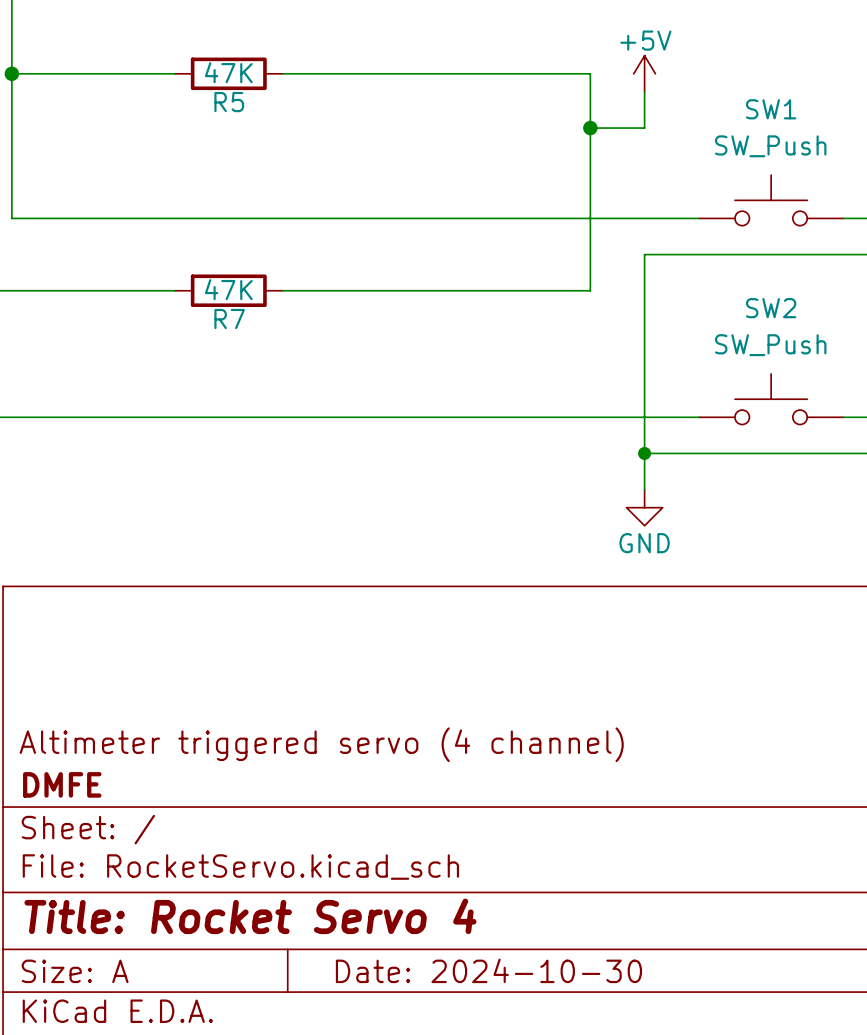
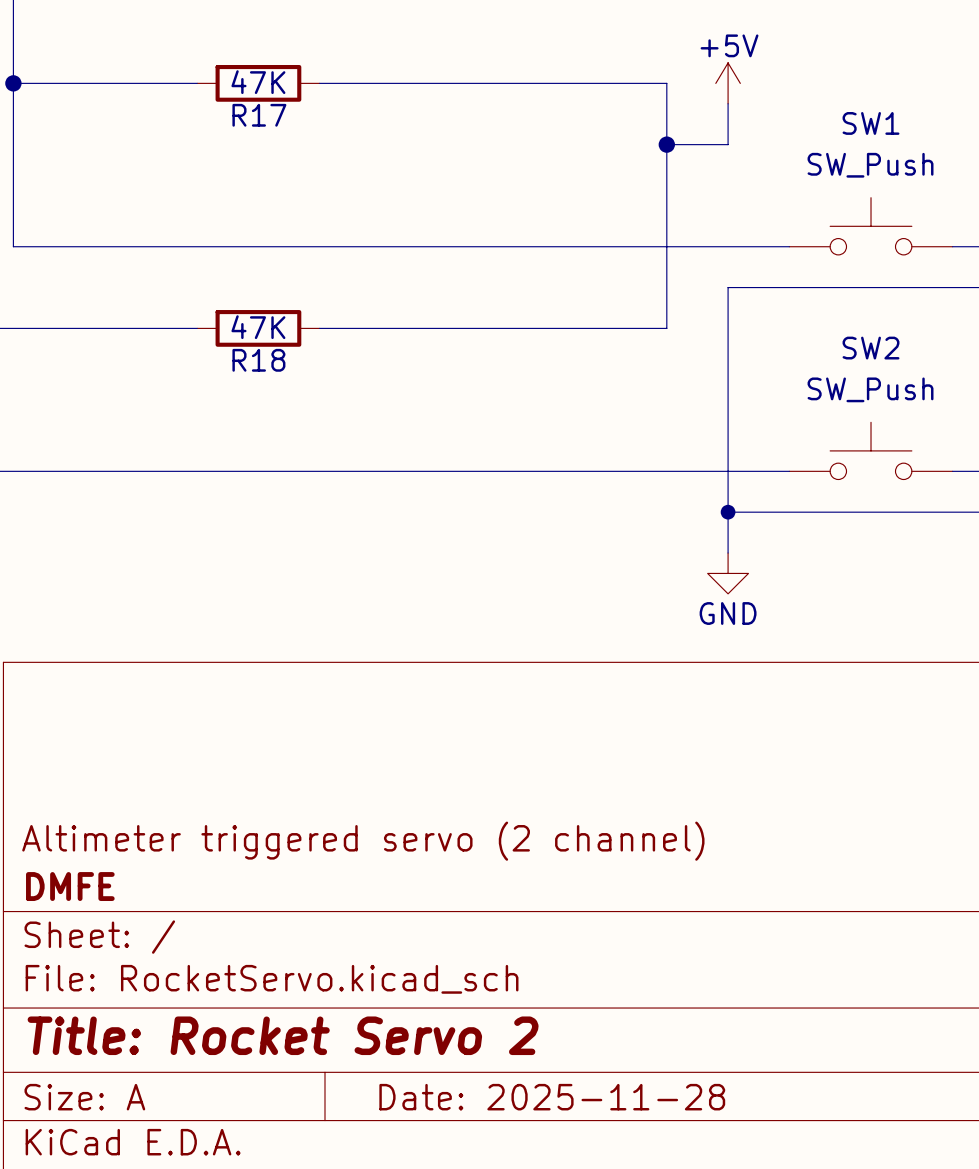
R5 name: R5 (229, 102) -> R17 (259, 115)
R7 name: R7 (229, 319) -> R18 (258, 360)
title block: Altimeter triggered servo (4 channel) (321, 744) -> Altimeter triggered servo (2 channel) (363, 841)
title block: Title: Rocket Servo 4 (250, 916) -> Title: Rocket Servo 2 (283, 1035)
title block: Date: 2024-10-30 (488, 970) -> Date: 2025-11-28 (552, 1097)

